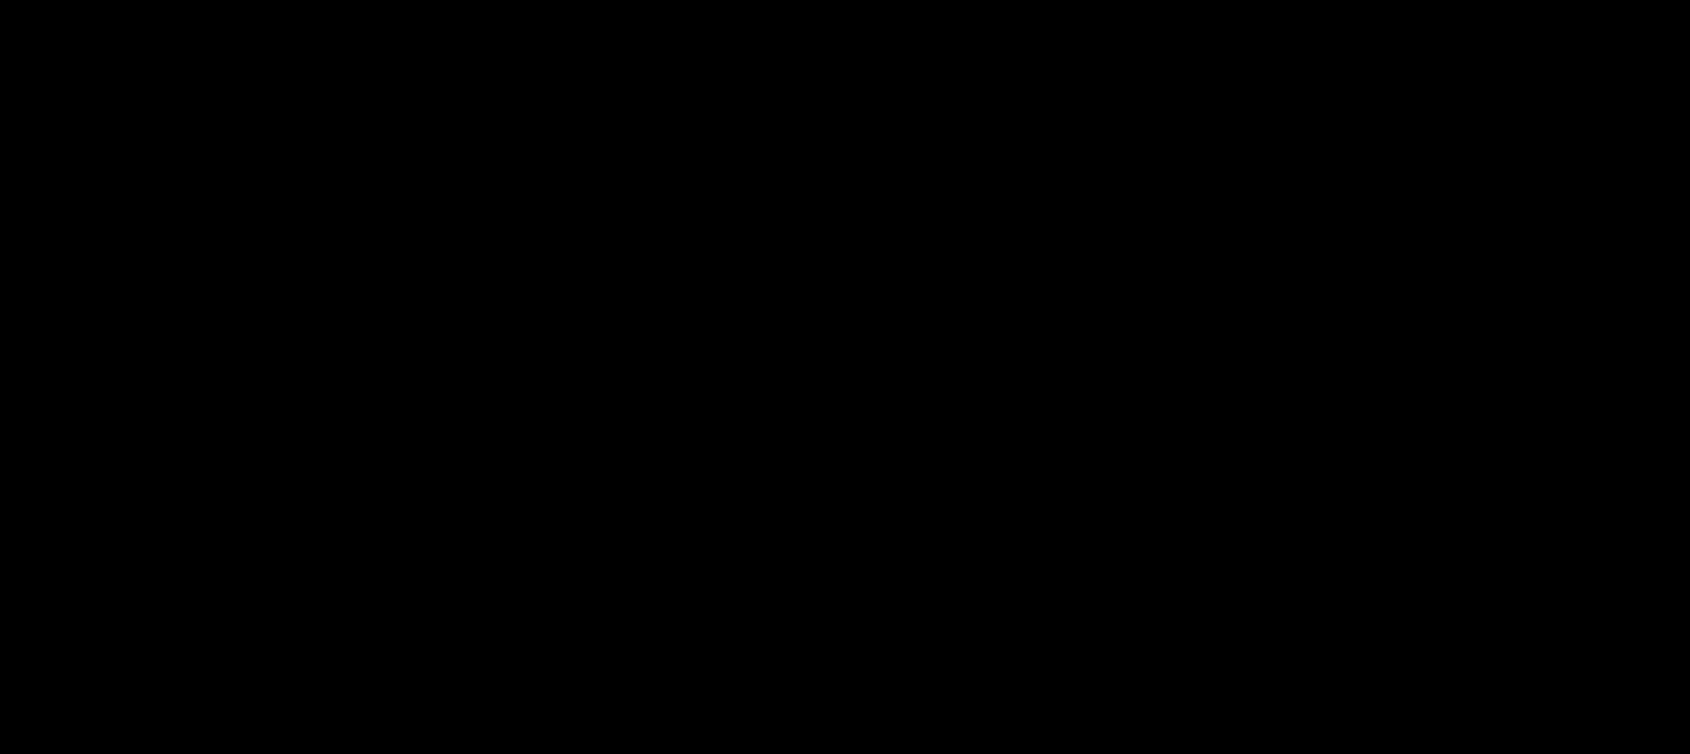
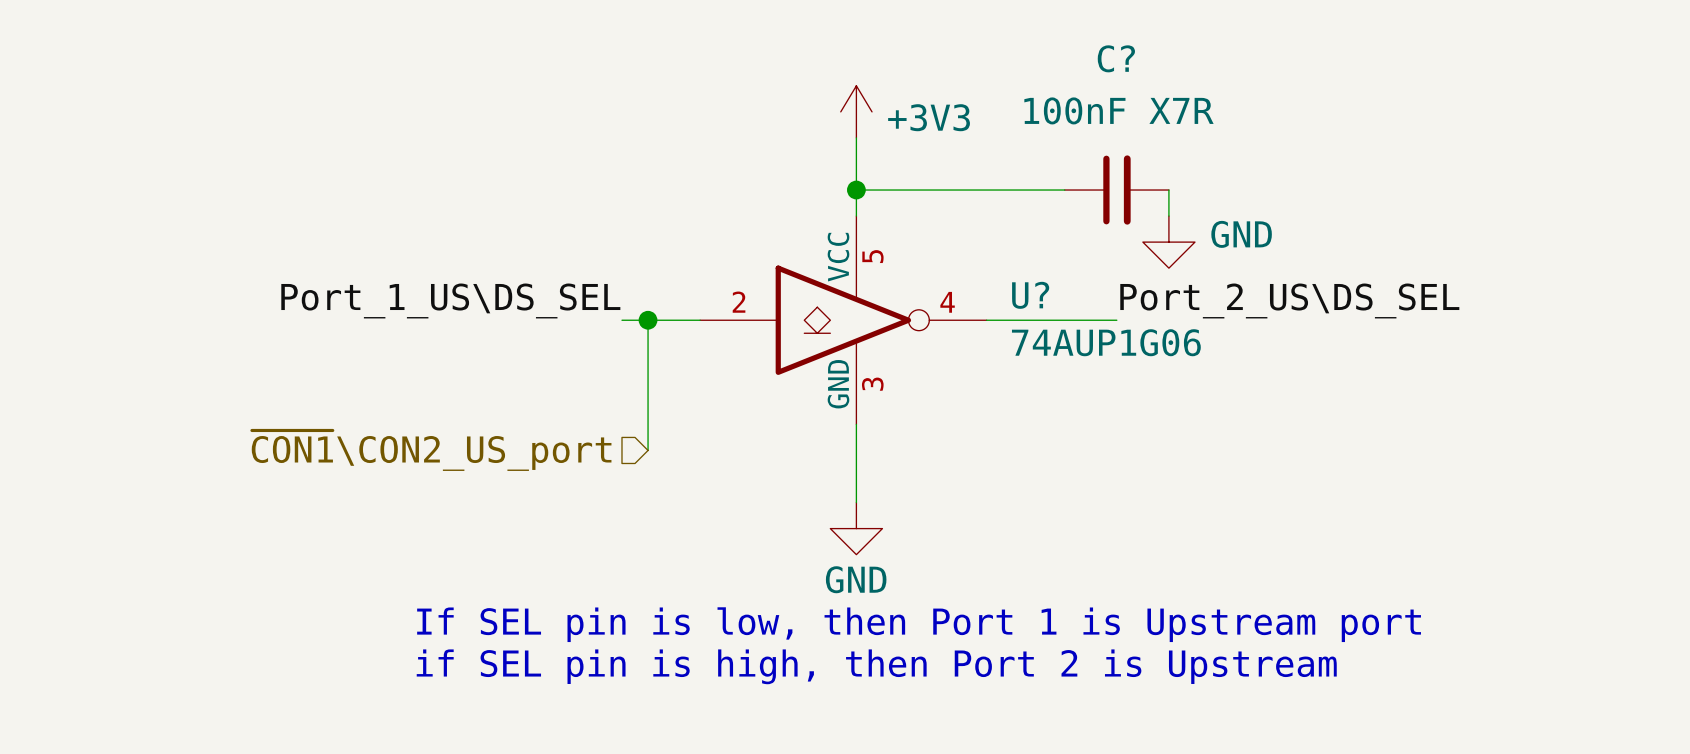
power symbol: none -> +3V3 (856, 111)
wire: none -> (856, 137) (856, 216)
wire: none -> (856, 190) (1064, 190)
junction: none -> (856, 190)
C?: none -> 100nF X7R (1116, 190)
wire: none -> (1168, 190) (1168, 216)
power symbol: none -> GND (1168, 242)
label: none -> Port_1_US\DS_SEL (450, 300)
label: none -> Port_2_US\DS_SEL (1289, 300)
wire: none -> (621, 320) (700, 320)
wire: none -> (648, 320) (648, 450)
junction: none -> (648, 320)
U?: none -> 74AUP1G06 (843, 320)
wire: none -> (986, 320) (1116, 320)
wire: none -> (856, 424) (856, 502)
hierarchical label: none -> ~{CON1}\CON2_US_port (431, 450)
power symbol: none -> GND (856, 528)
text: none -> If SEL pin is low, then Port 1 is Upstream port (919, 624)
text: none -> if SEL pin is high, then Port 2 is Upstream (876, 666)

